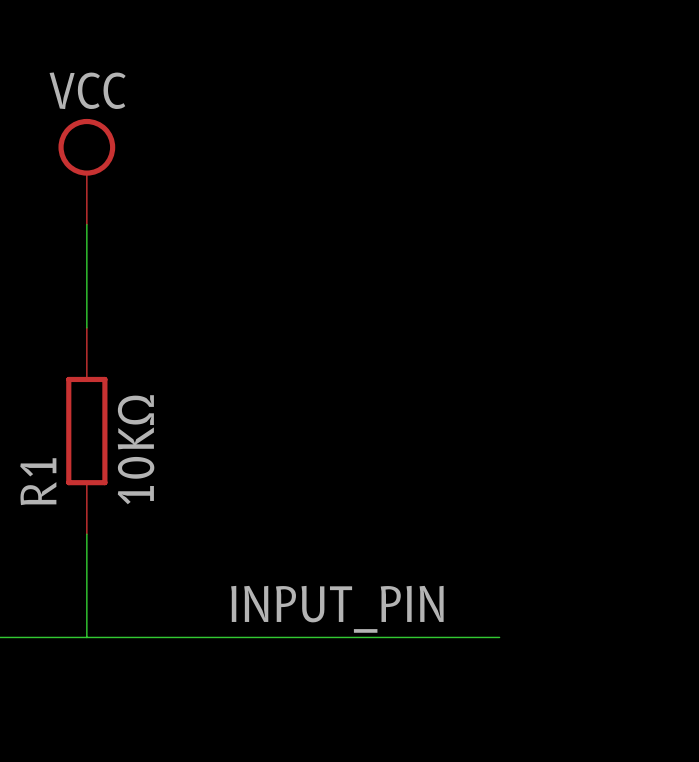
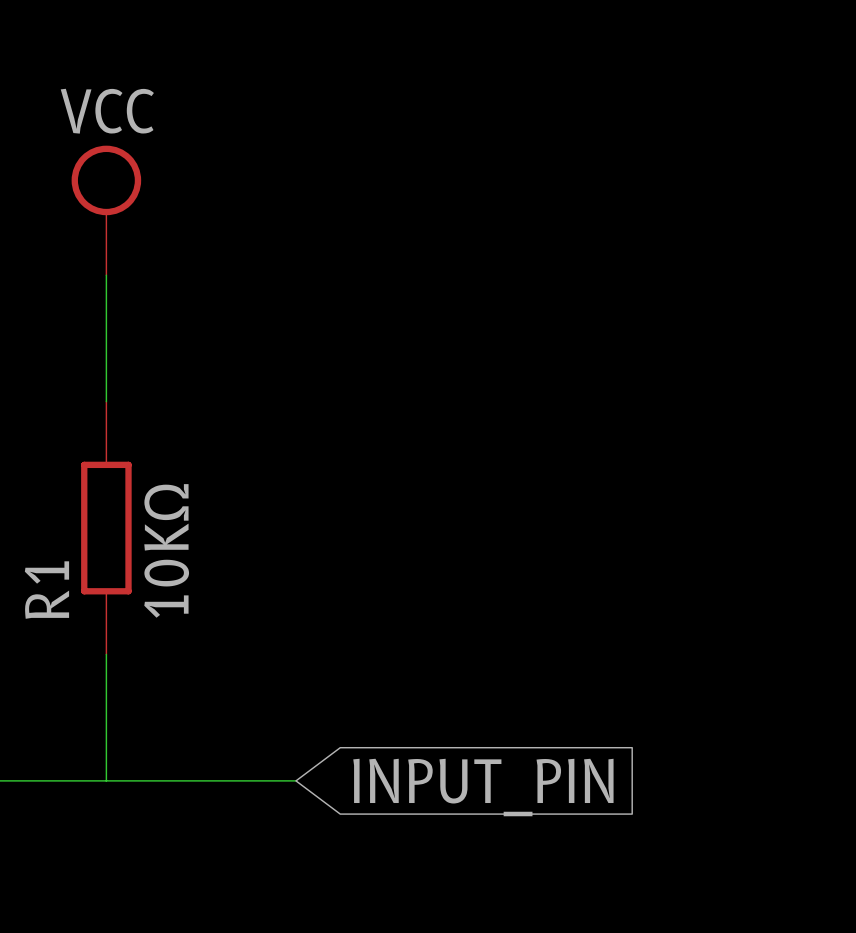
label: INPUT_PIN (337, 609) -> none
wire: (241, 637) (499, 637) -> none
global label: none -> INPUT_PIN (483, 787)

